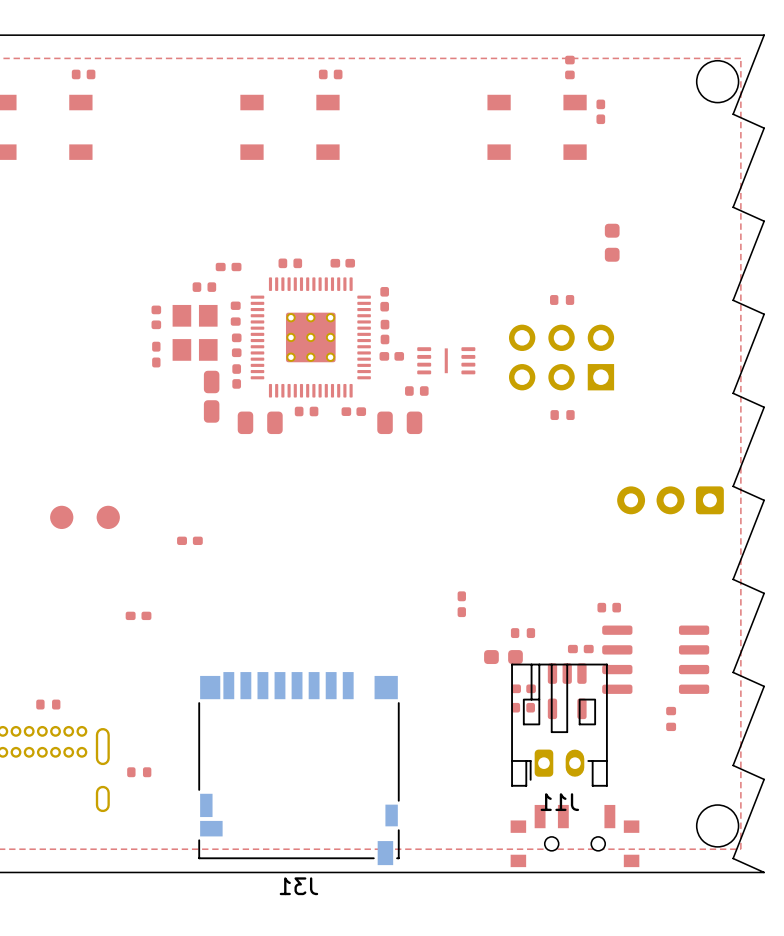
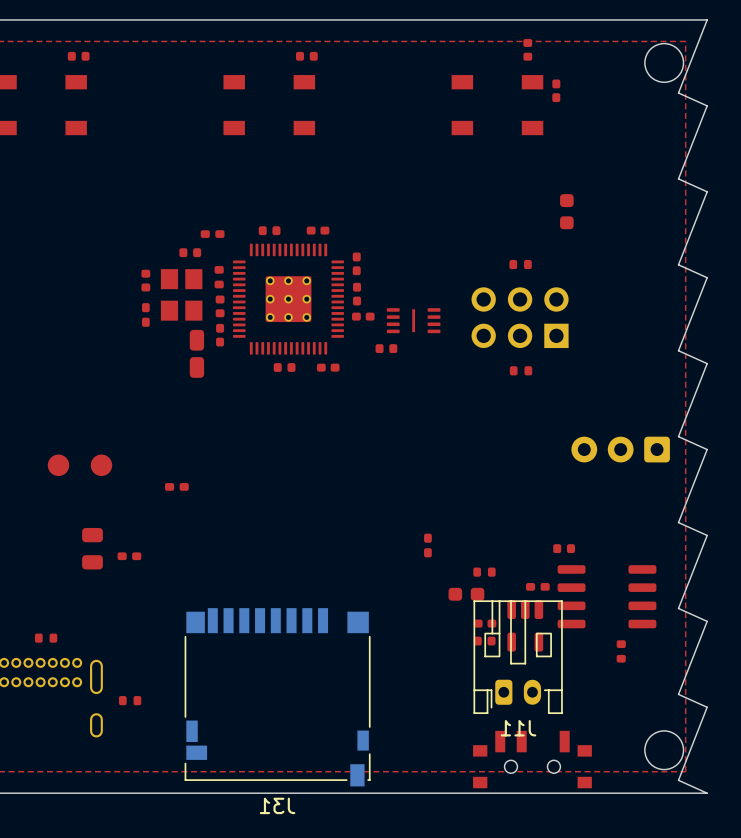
part: (260, 422) -> none
part: (399, 422) -> none
part: none -> (92, 548)

